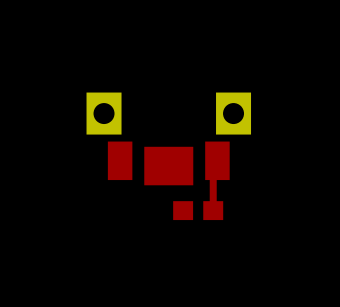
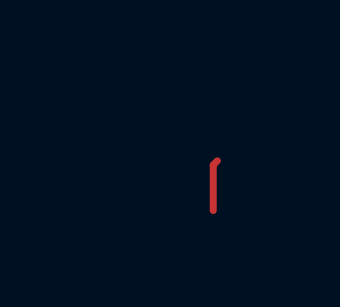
part: (168, 138) -> none
part: (198, 210) -> none

